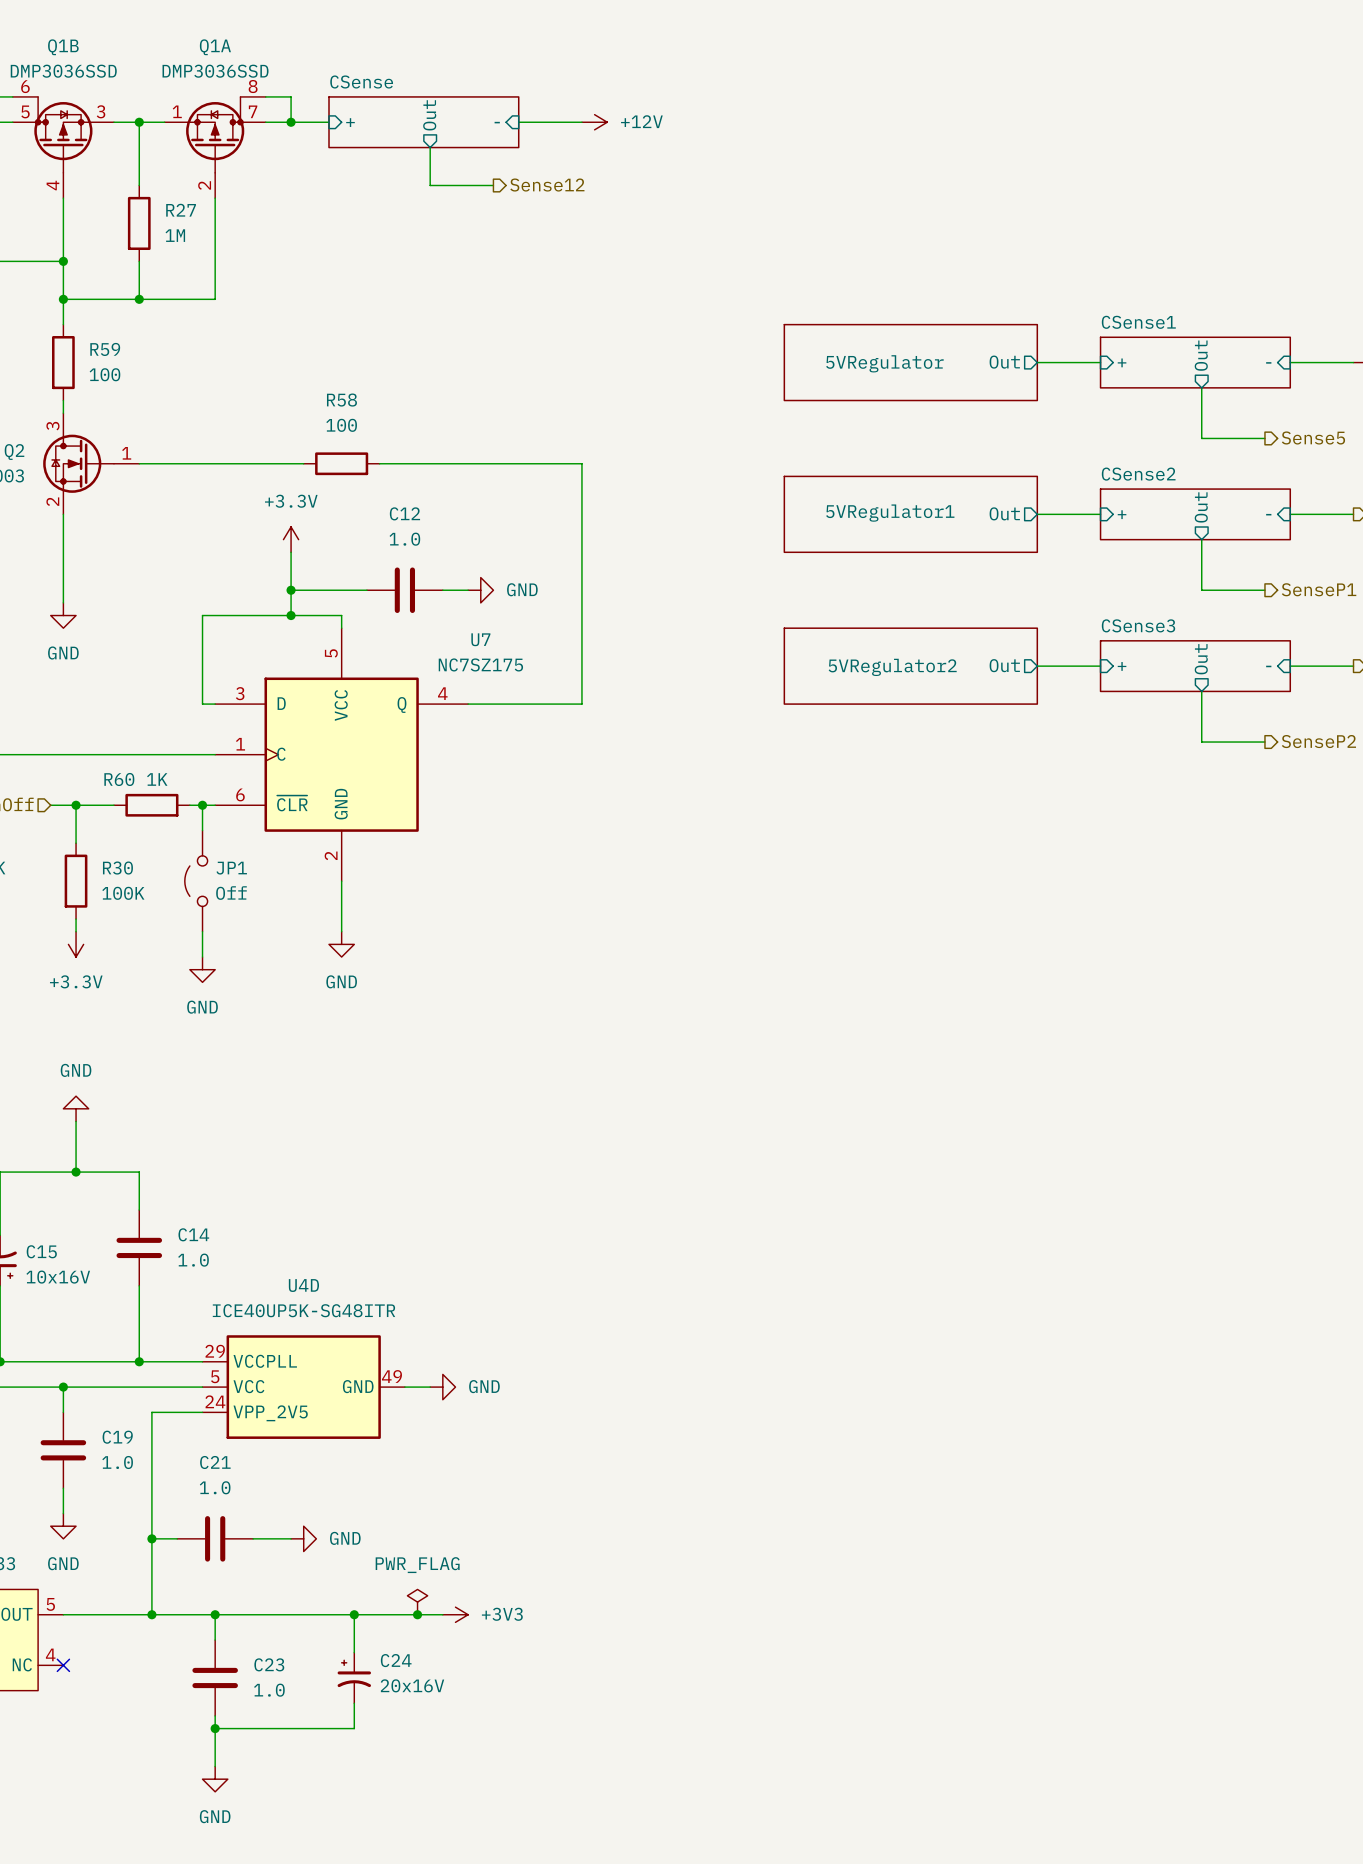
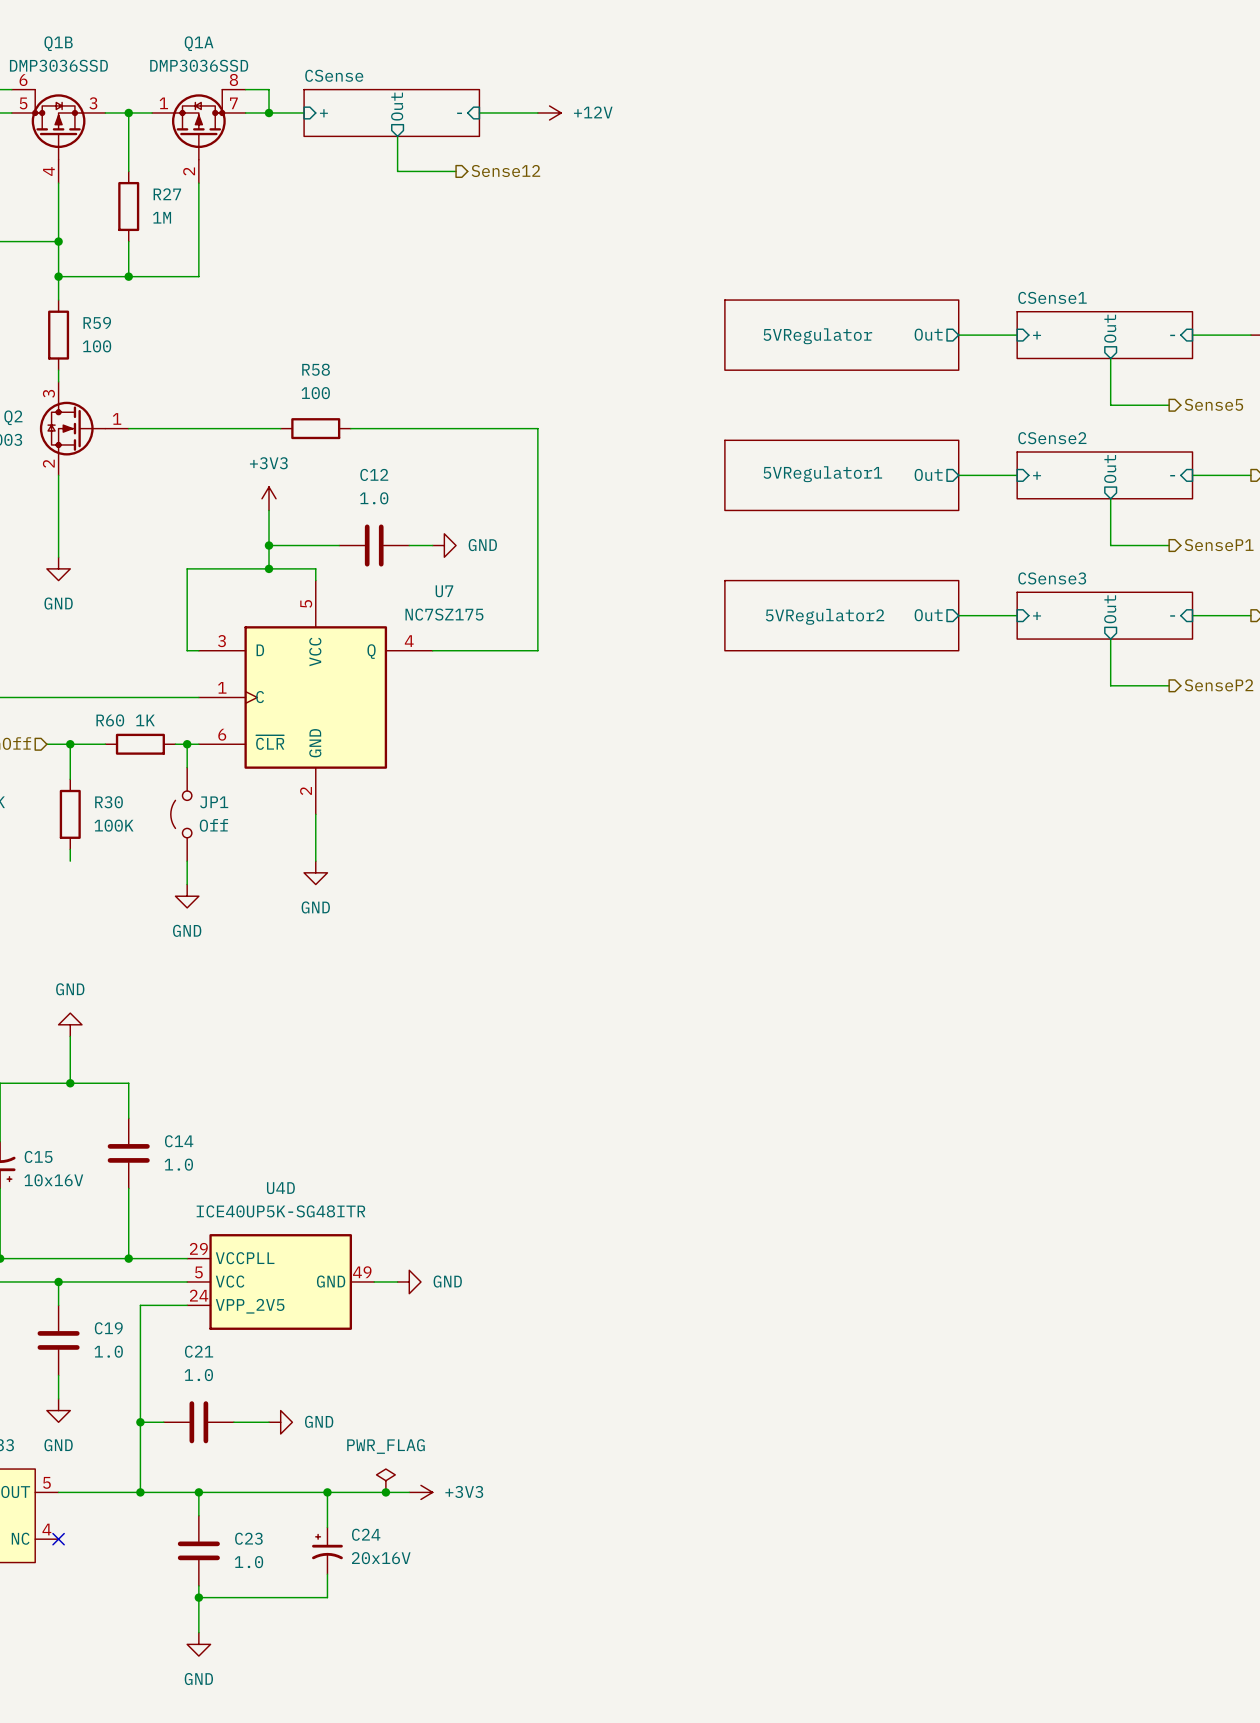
power symbol: +3.3V (291, 539) -> +3V3 (269, 498)
power symbol: +3.3V (76, 944) -> none

